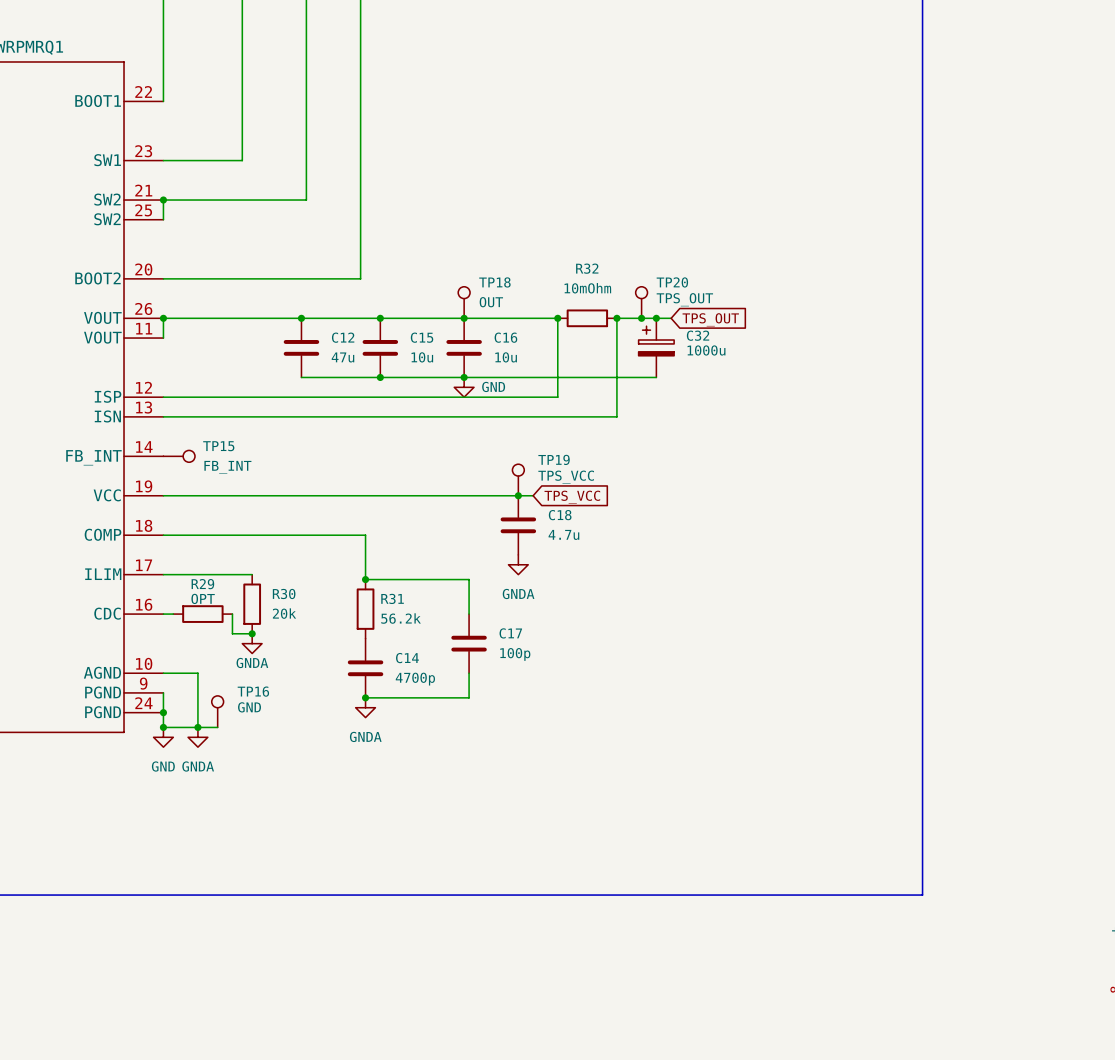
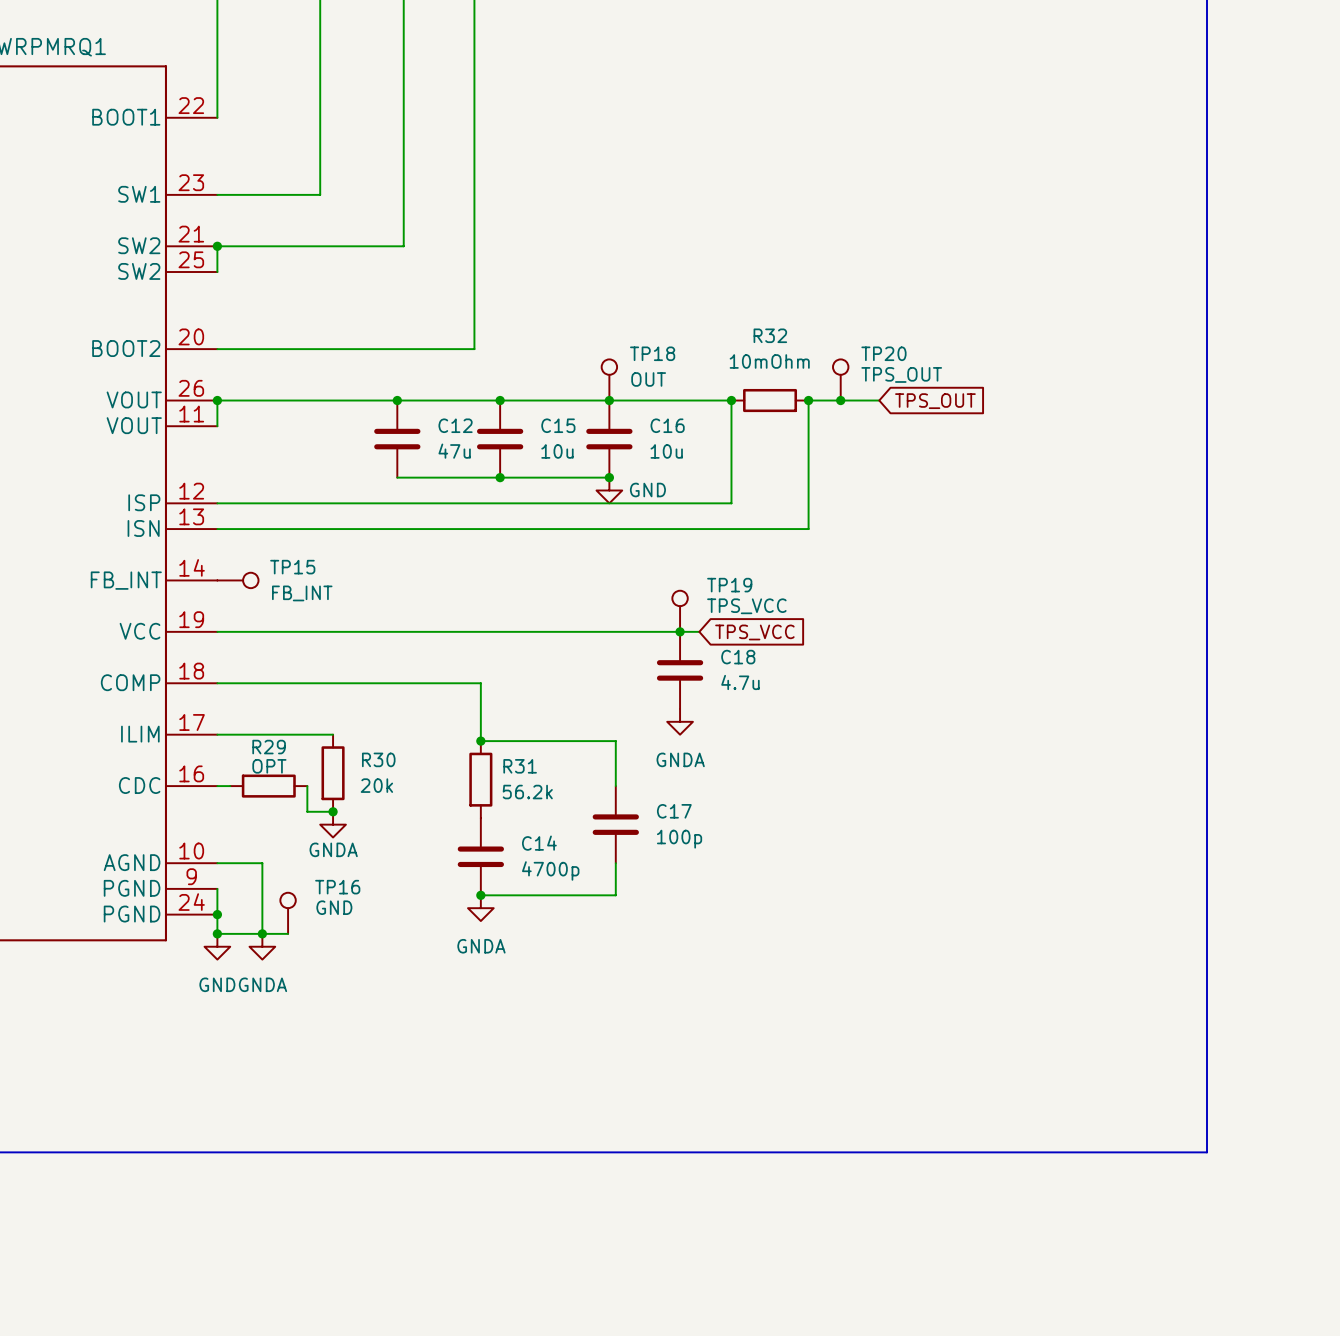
junction: (656, 318) -> none
C32: 1000u (656, 347) -> none
wire: (464, 377) (656, 377) -> none

